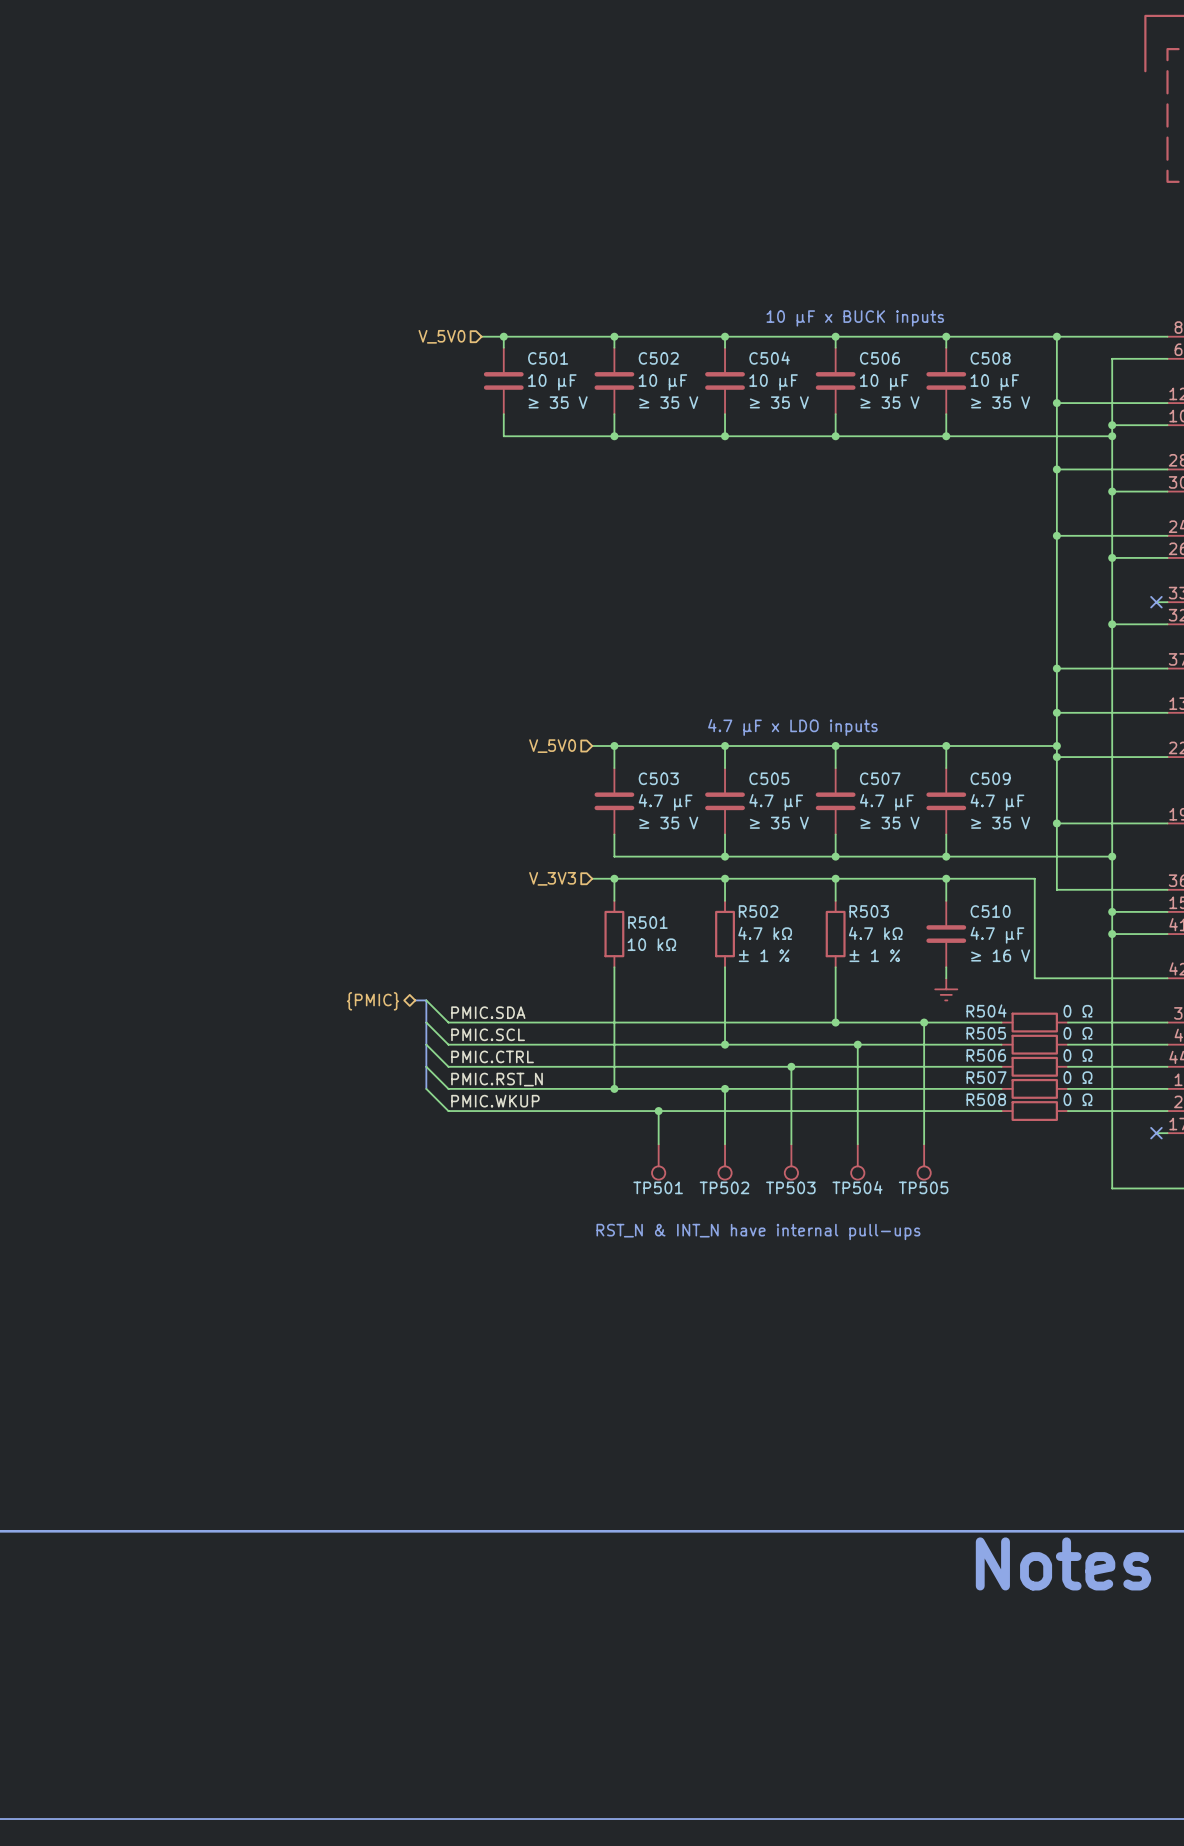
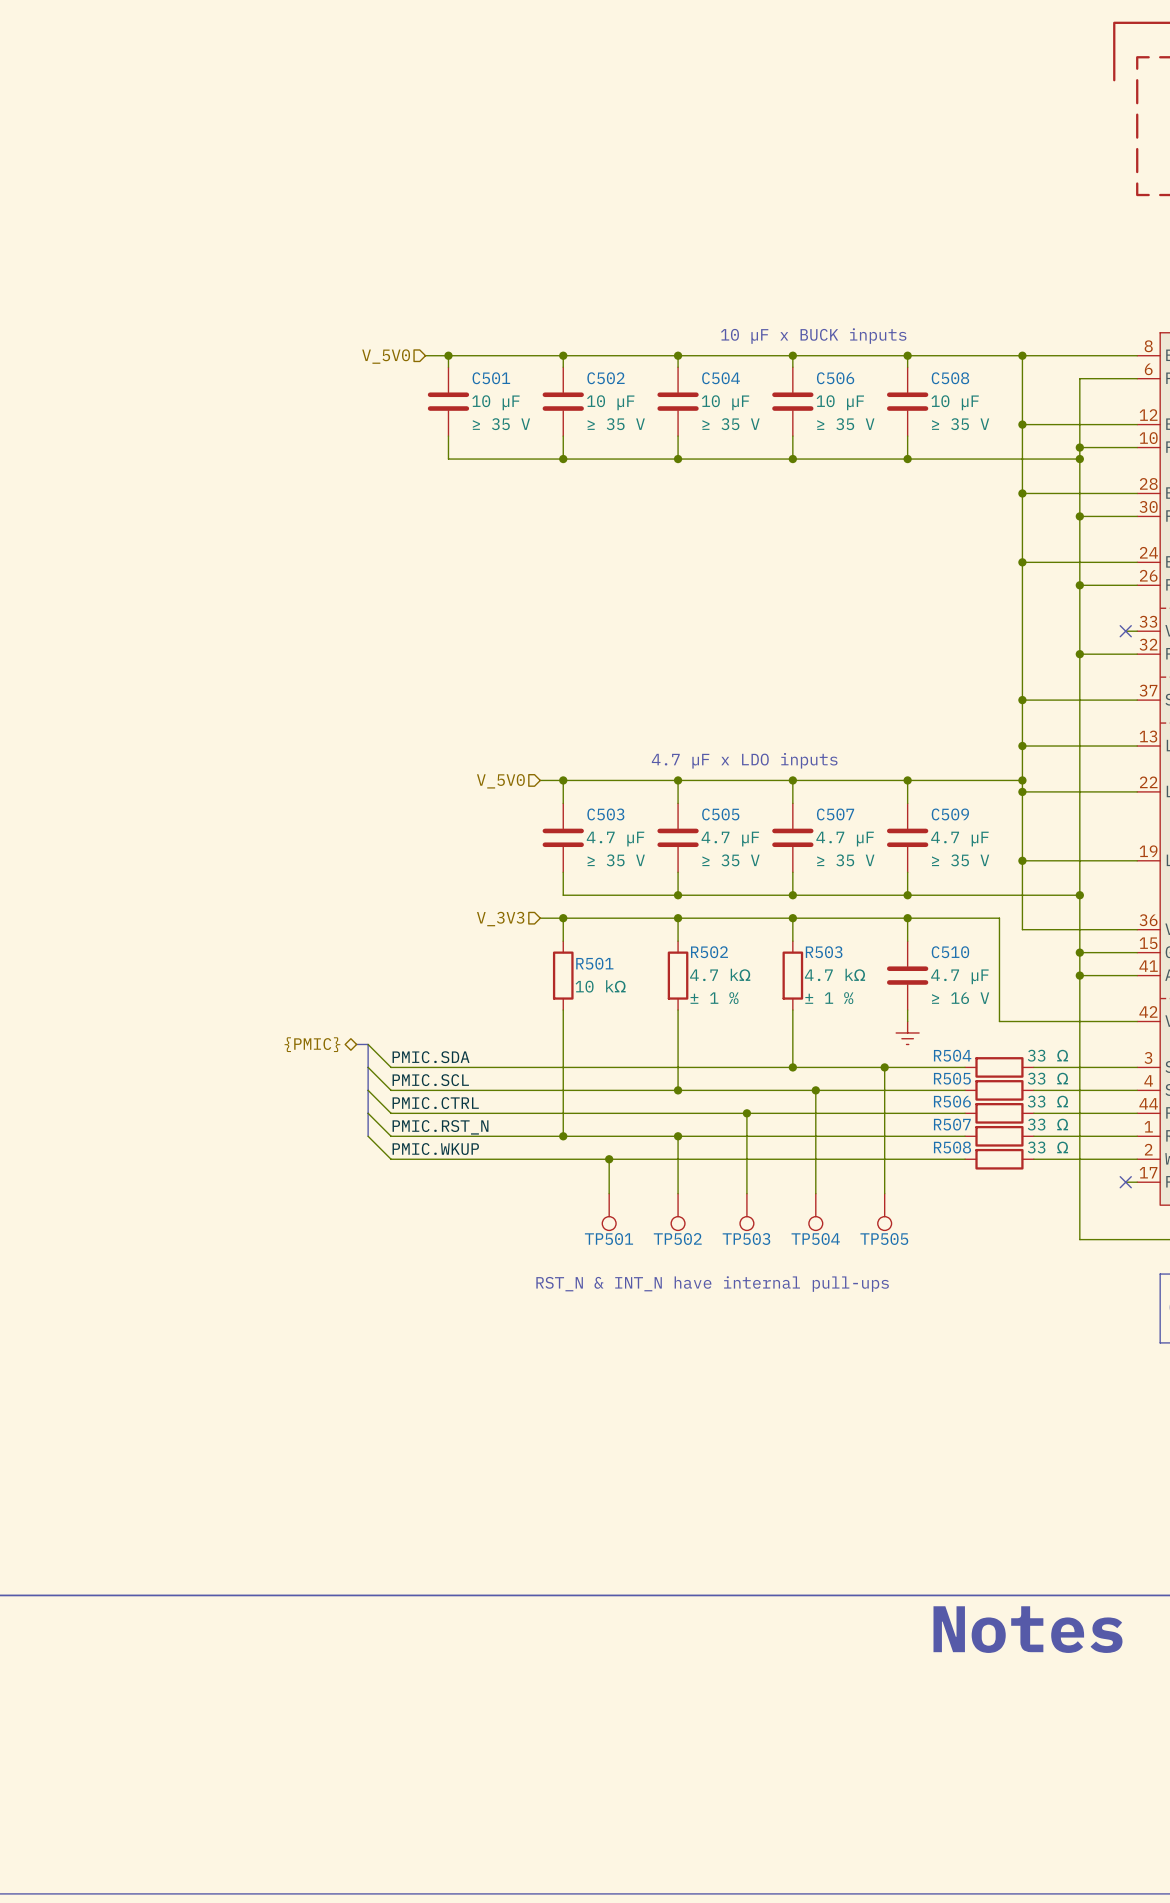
R504 value: 0 Ω (1077, 1011) -> 33 Ω (1047, 1055)
R505 value: 0 Ω (1077, 1033) -> 33 Ω (1047, 1078)
R506 value: 0 Ω (1077, 1055) -> 33 Ω (1047, 1101)
R507 value: 0 Ω (1077, 1077) -> 33 Ω (1047, 1124)
R508 value: 0 Ω (1077, 1099) -> 33 Ω (1047, 1147)

